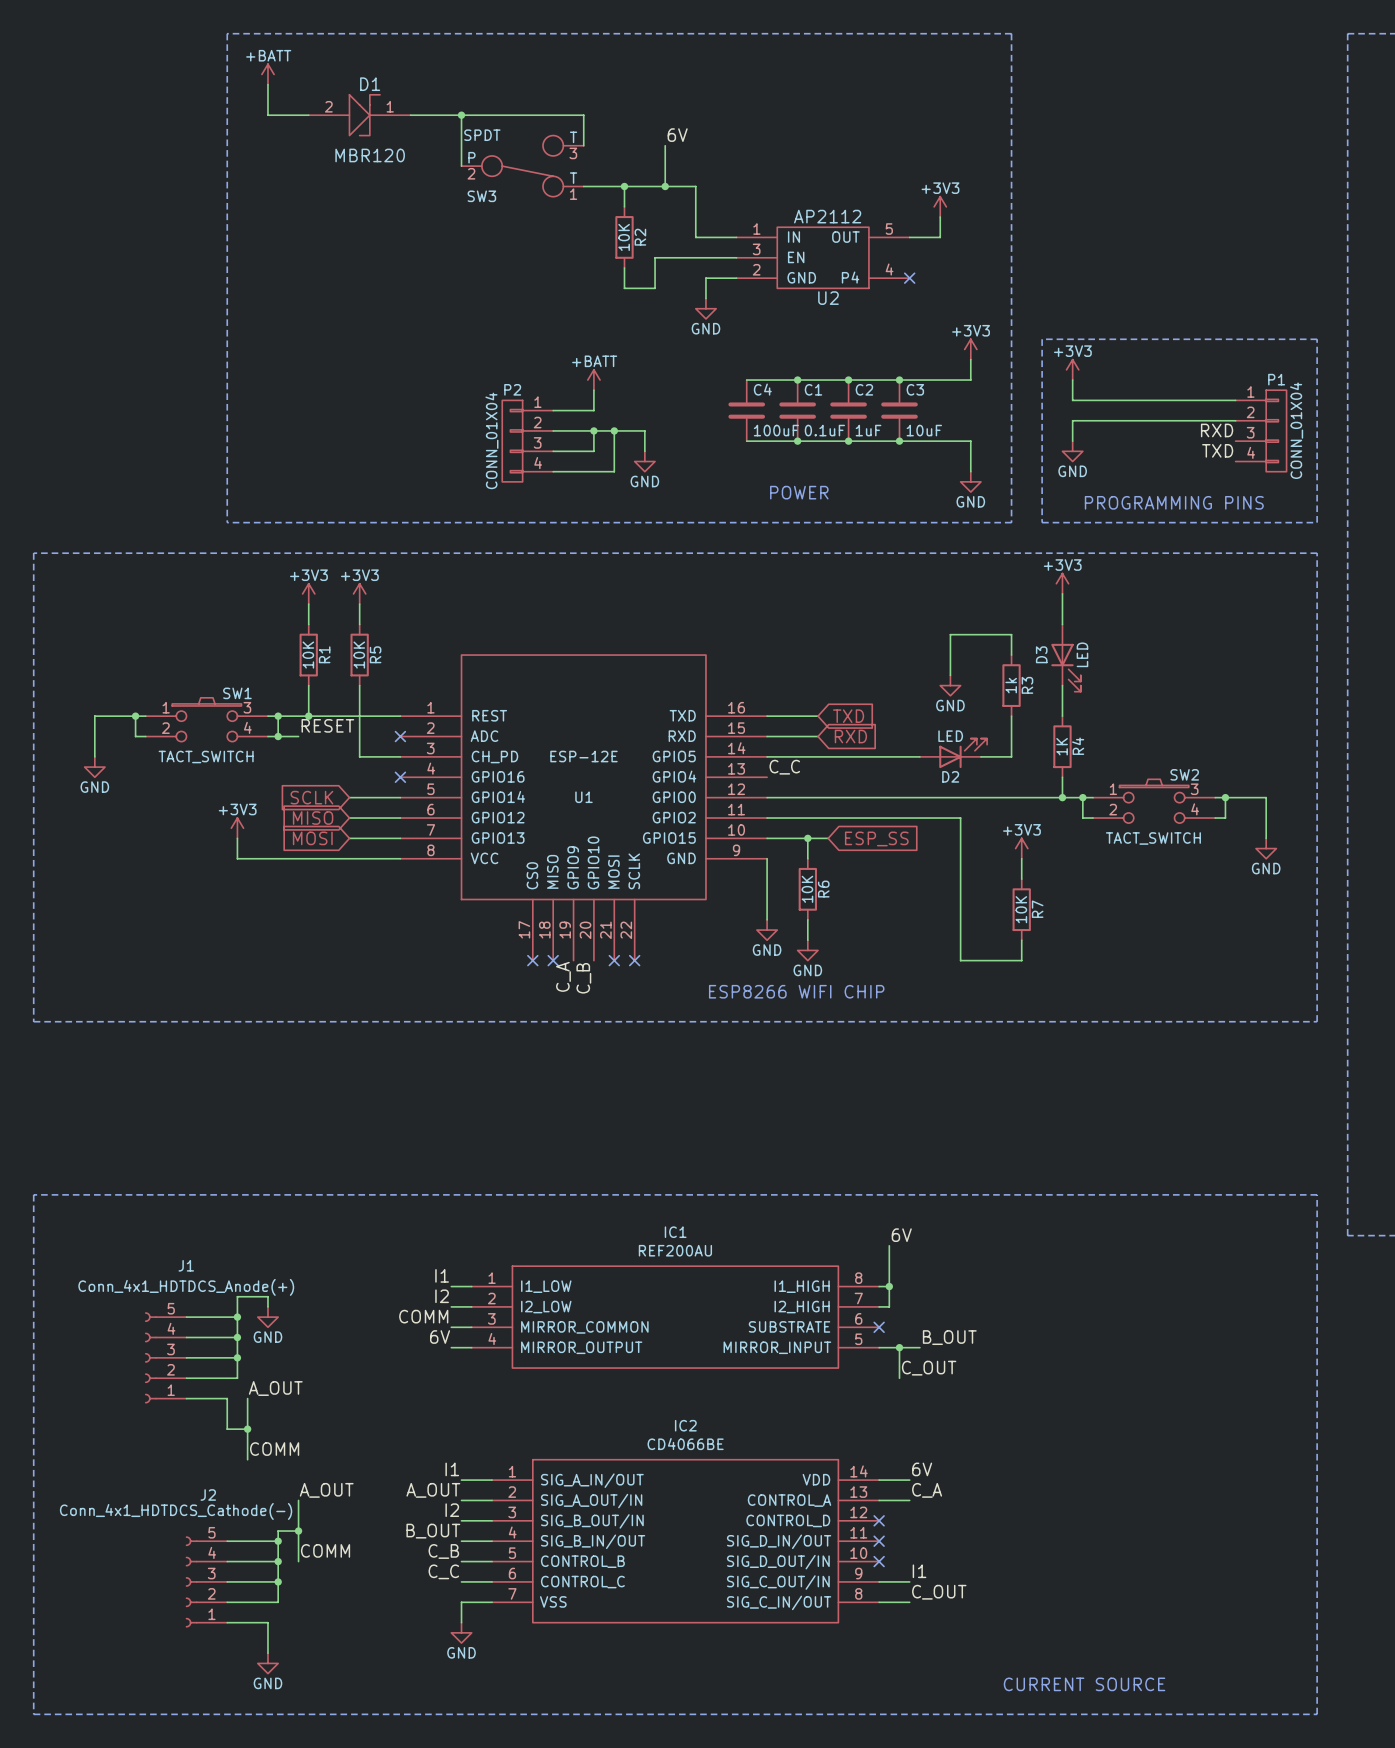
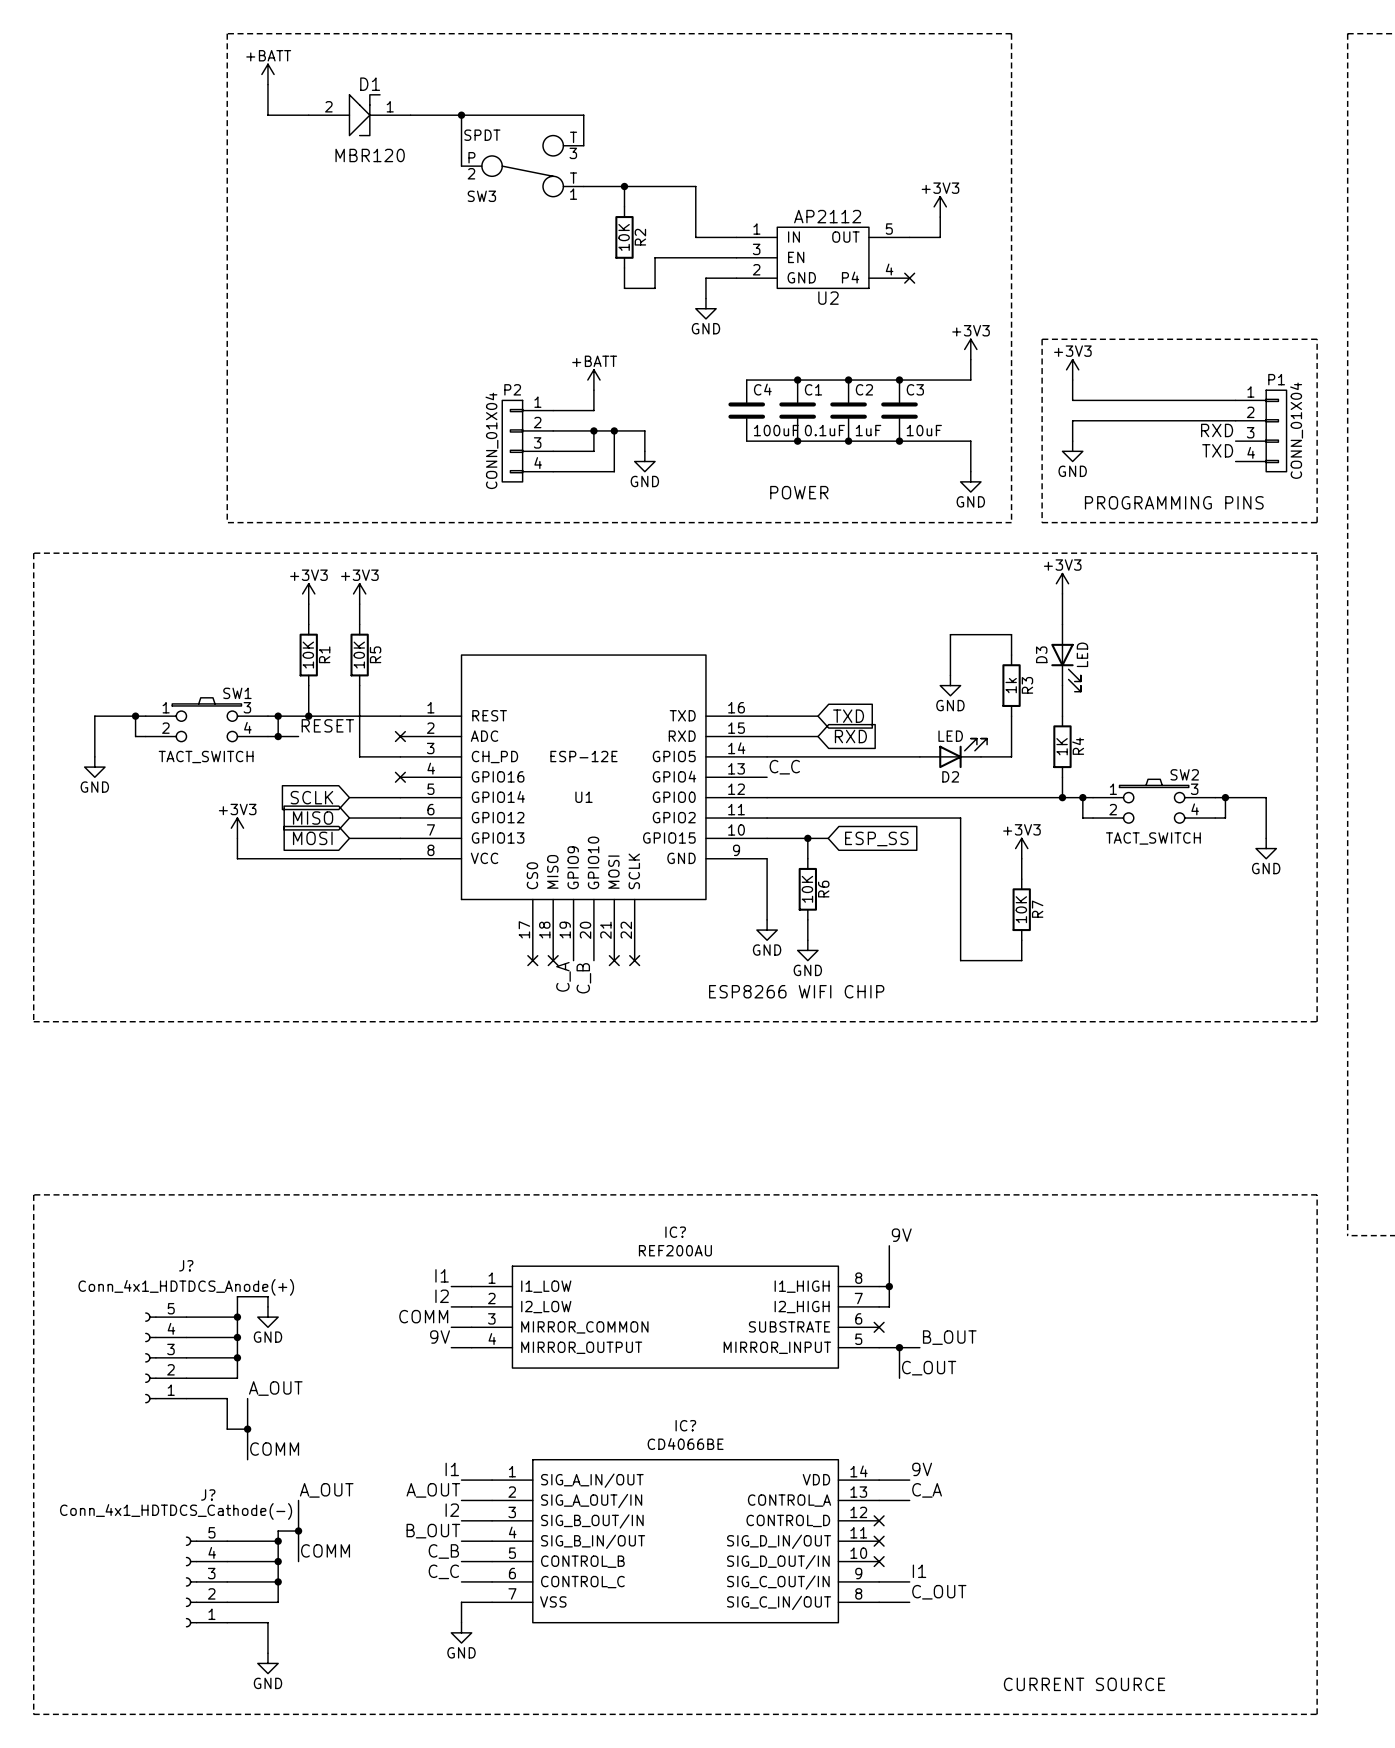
label: 6V (677, 135) -> none
wire: (665, 145) (665, 186) -> none
junction: (665, 186) -> none
IC1 name: IC1 (675, 1232) -> IC? (675, 1232)
label: 6V (901, 1235) -> 9V (901, 1235)
J1 name: J1 (186, 1265) -> J? (186, 1265)
label: 6V (440, 1337) -> 9V (440, 1337)
IC2 name: IC2 (685, 1425) -> IC? (685, 1425)
label: 6V (922, 1469) -> 9V (922, 1469)
J2 name: J2 (208, 1494) -> J? (208, 1494)

